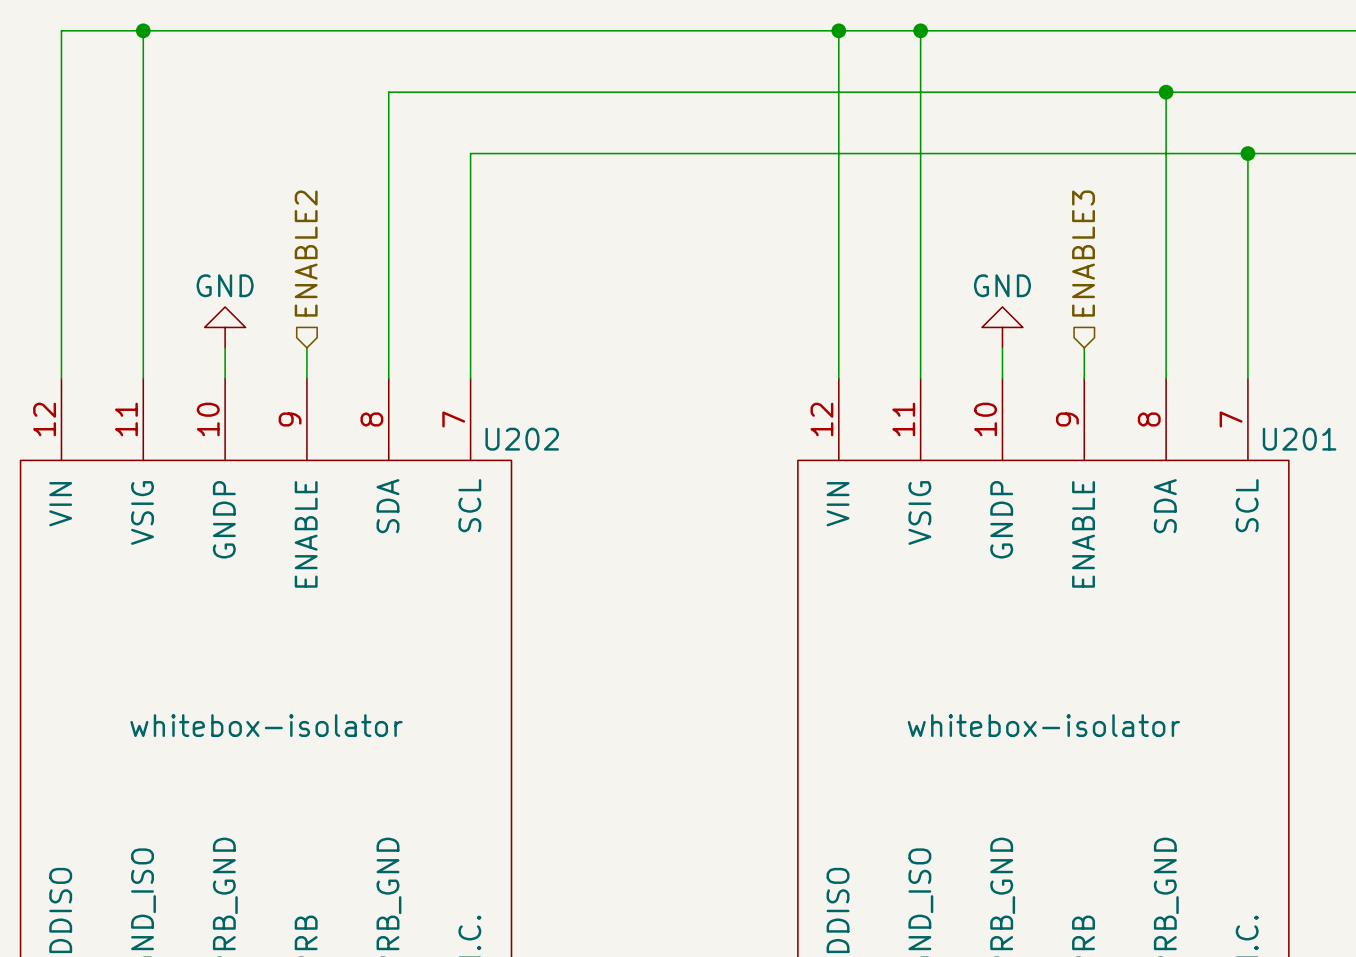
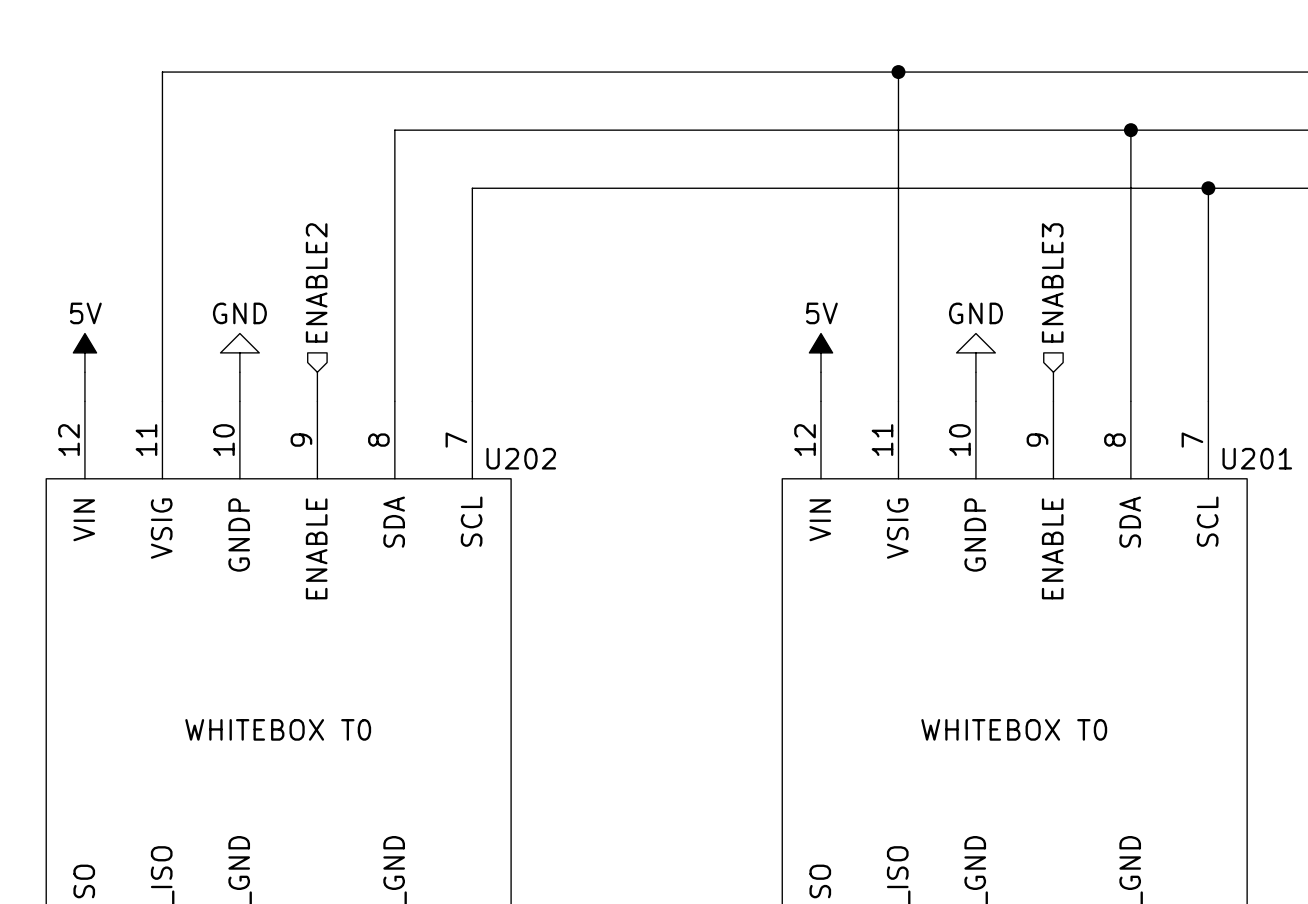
wire: (143, 30) (61, 30) (61, 347) -> none
junction: (143, 30) -> none
wire: (838, 30) (838, 347) -> none
junction: (838, 30) -> none
power symbol: none -> 5V (84, 352)
power symbol: none -> 5V (821, 352)
U202 value: whitebox-isolator (266, 725) -> WHITEBOX T0 (278, 729)
U201 value: whitebox-isolator (1043, 725) -> WHITEBOX T0 (1014, 729)

